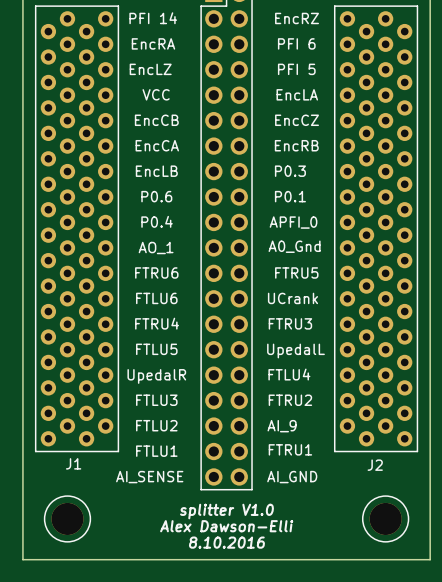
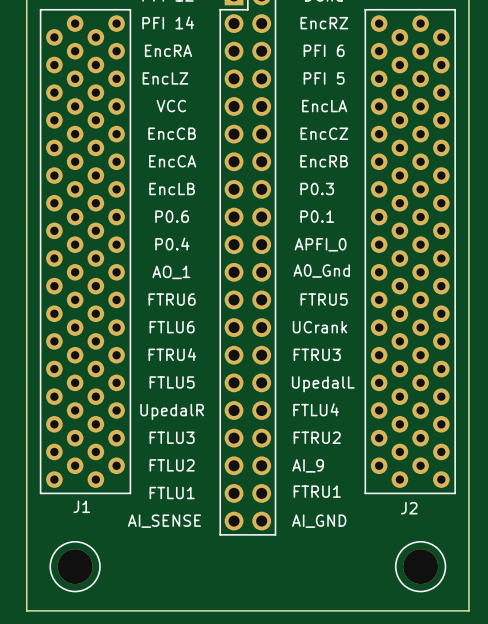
text: splitter V1.0 (226, 511) -> none
text: Alex Dawson-Elli (226, 526) -> none
text: 8.10.2016 (226, 542) -> none

